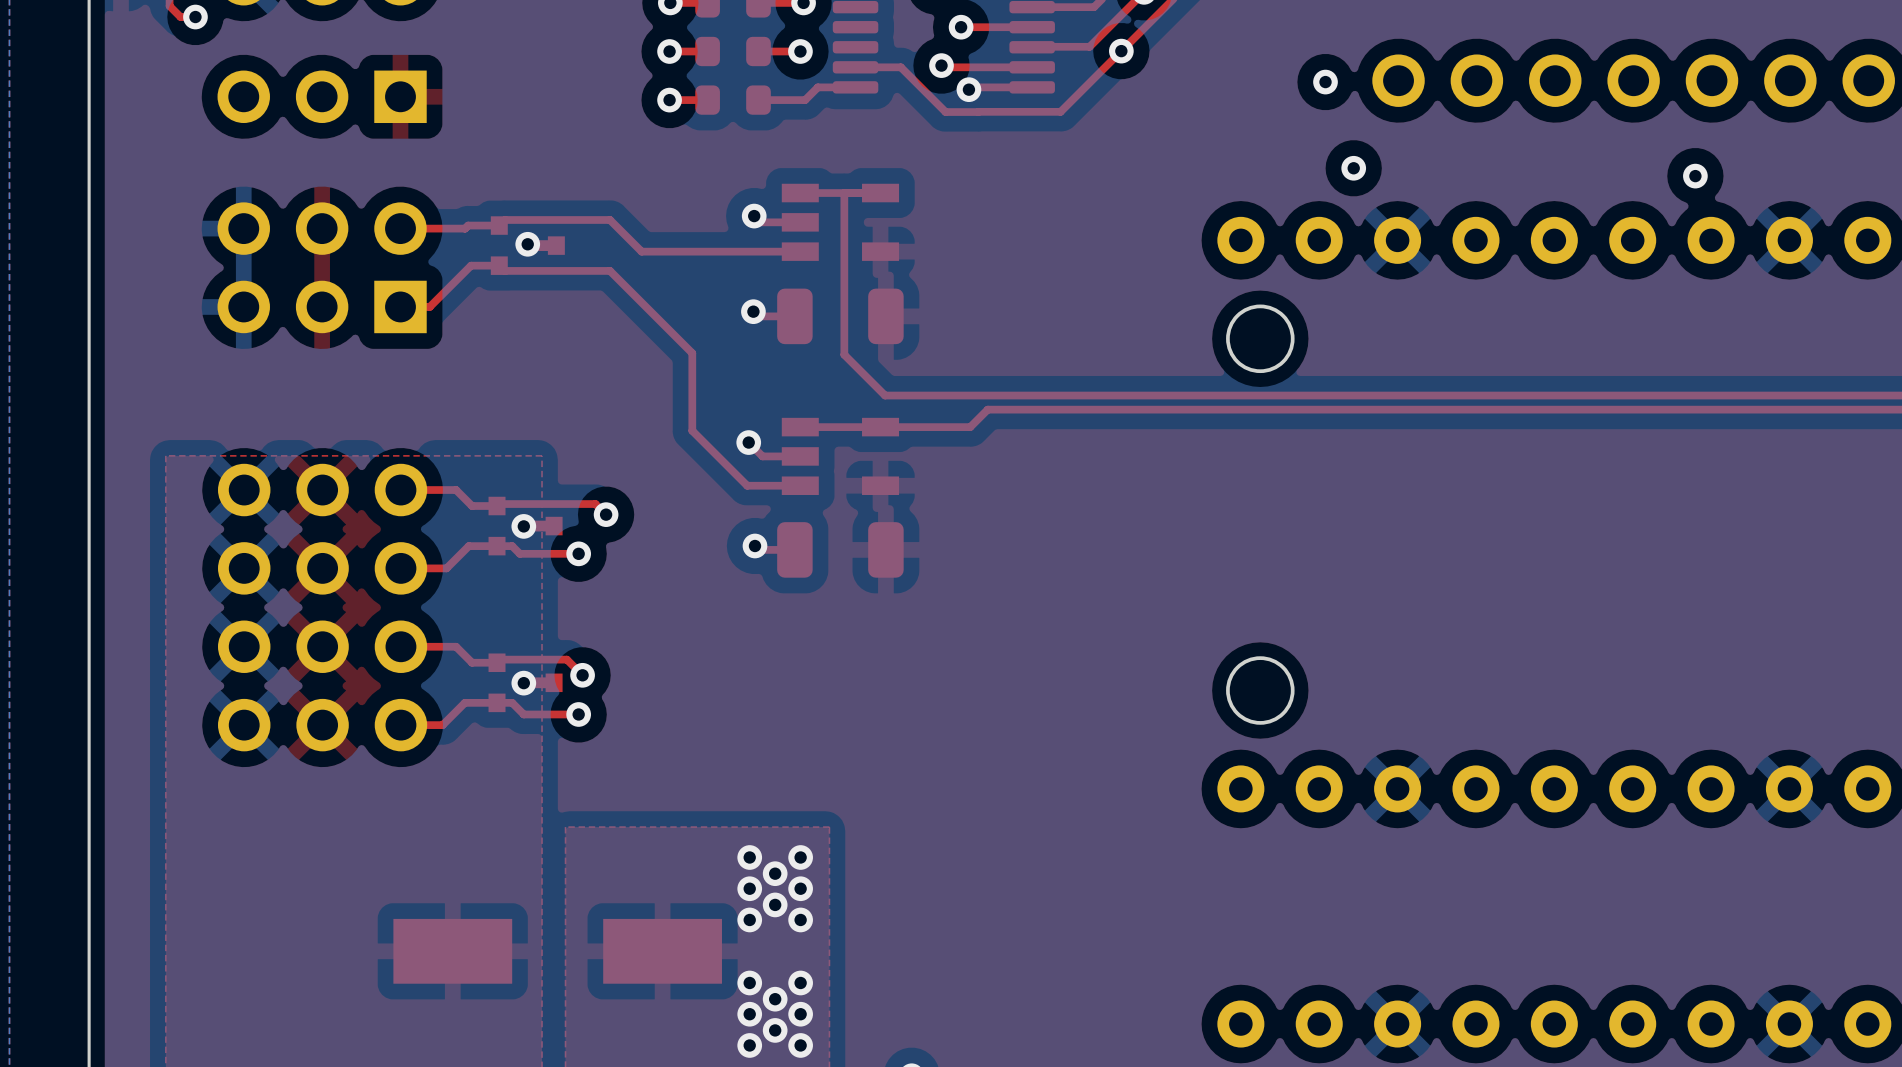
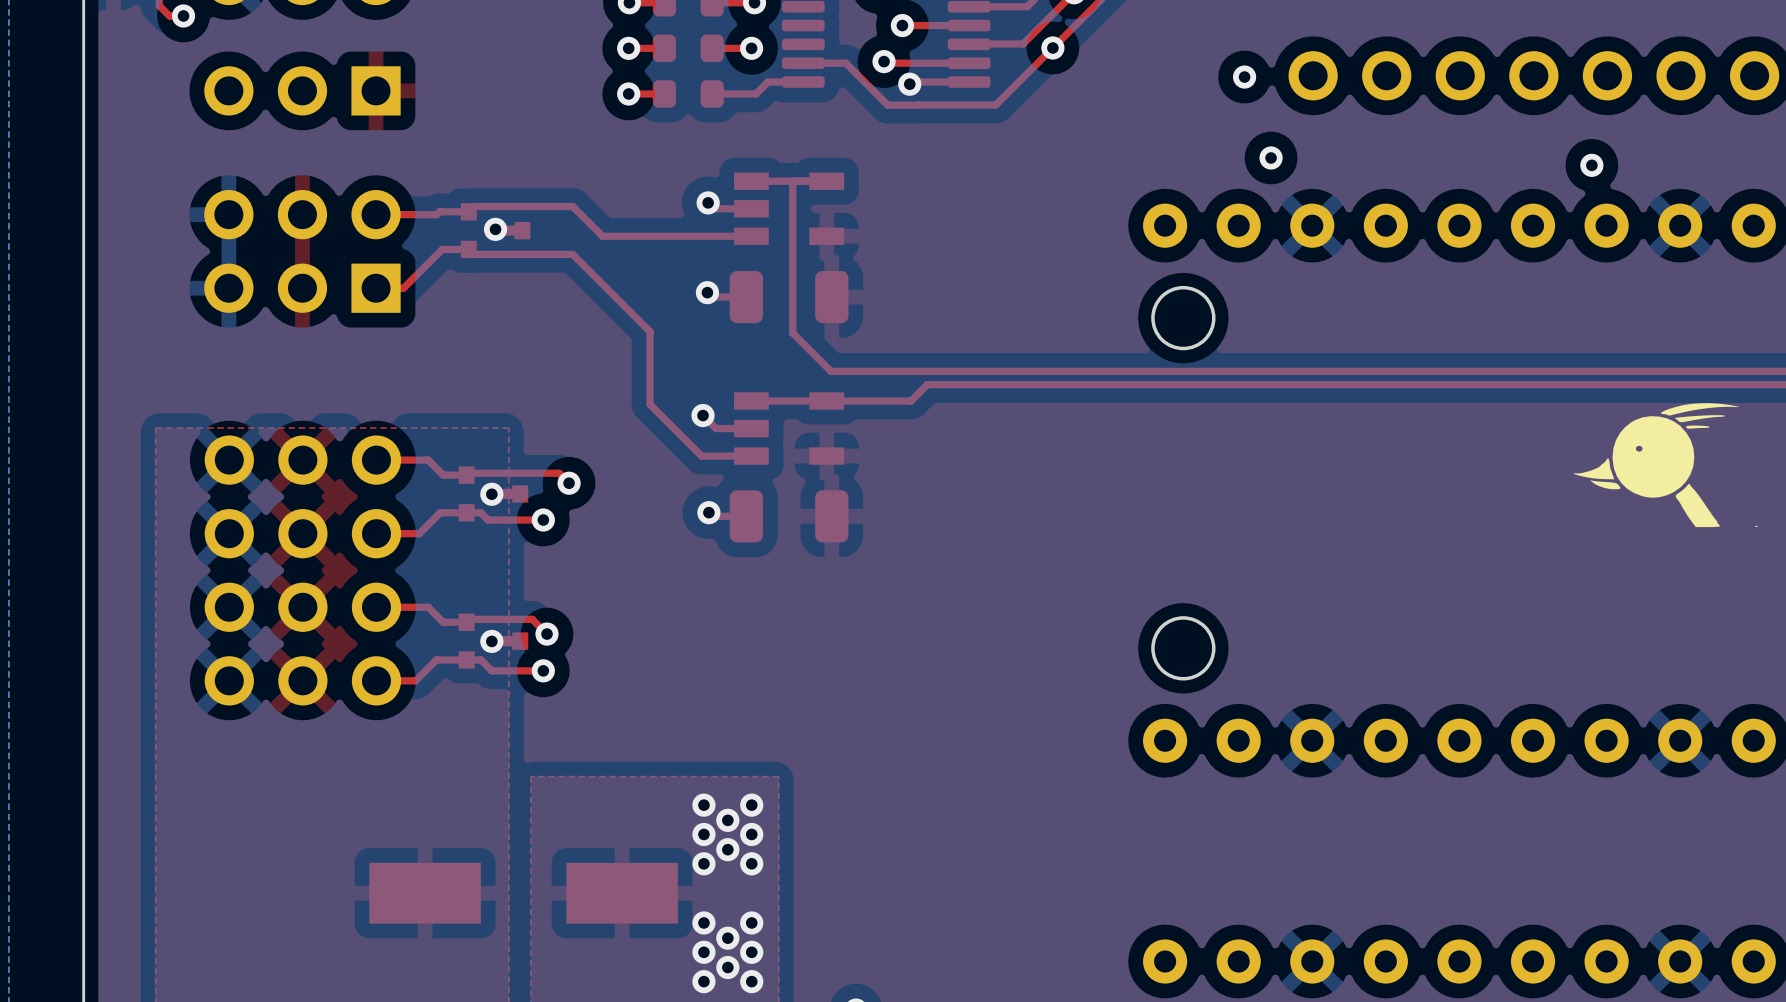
drawing: none -> [1573, 403, 1758, 528]

